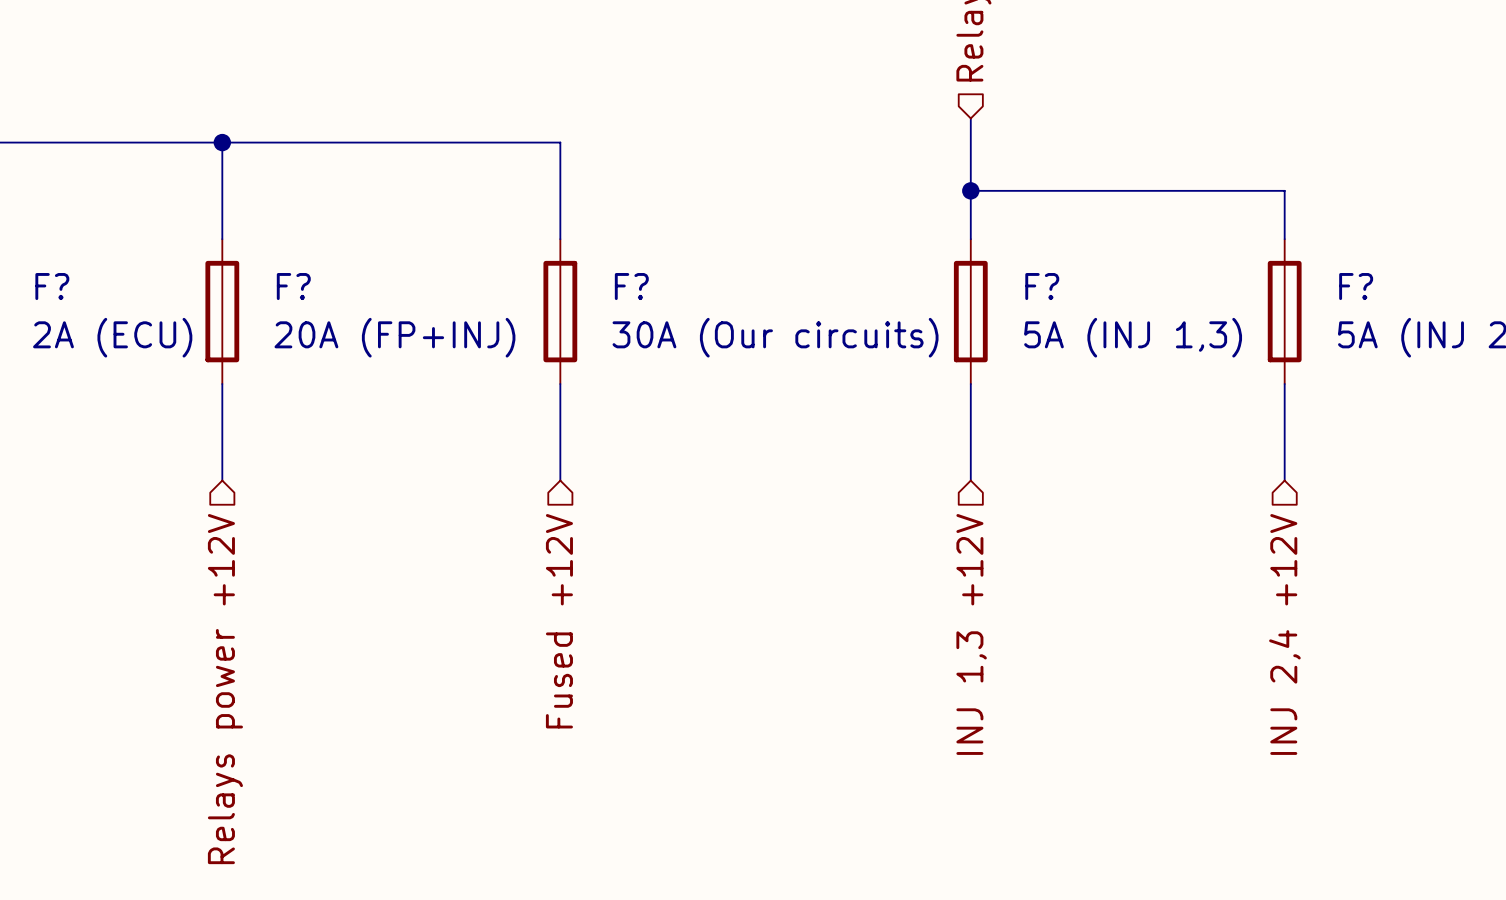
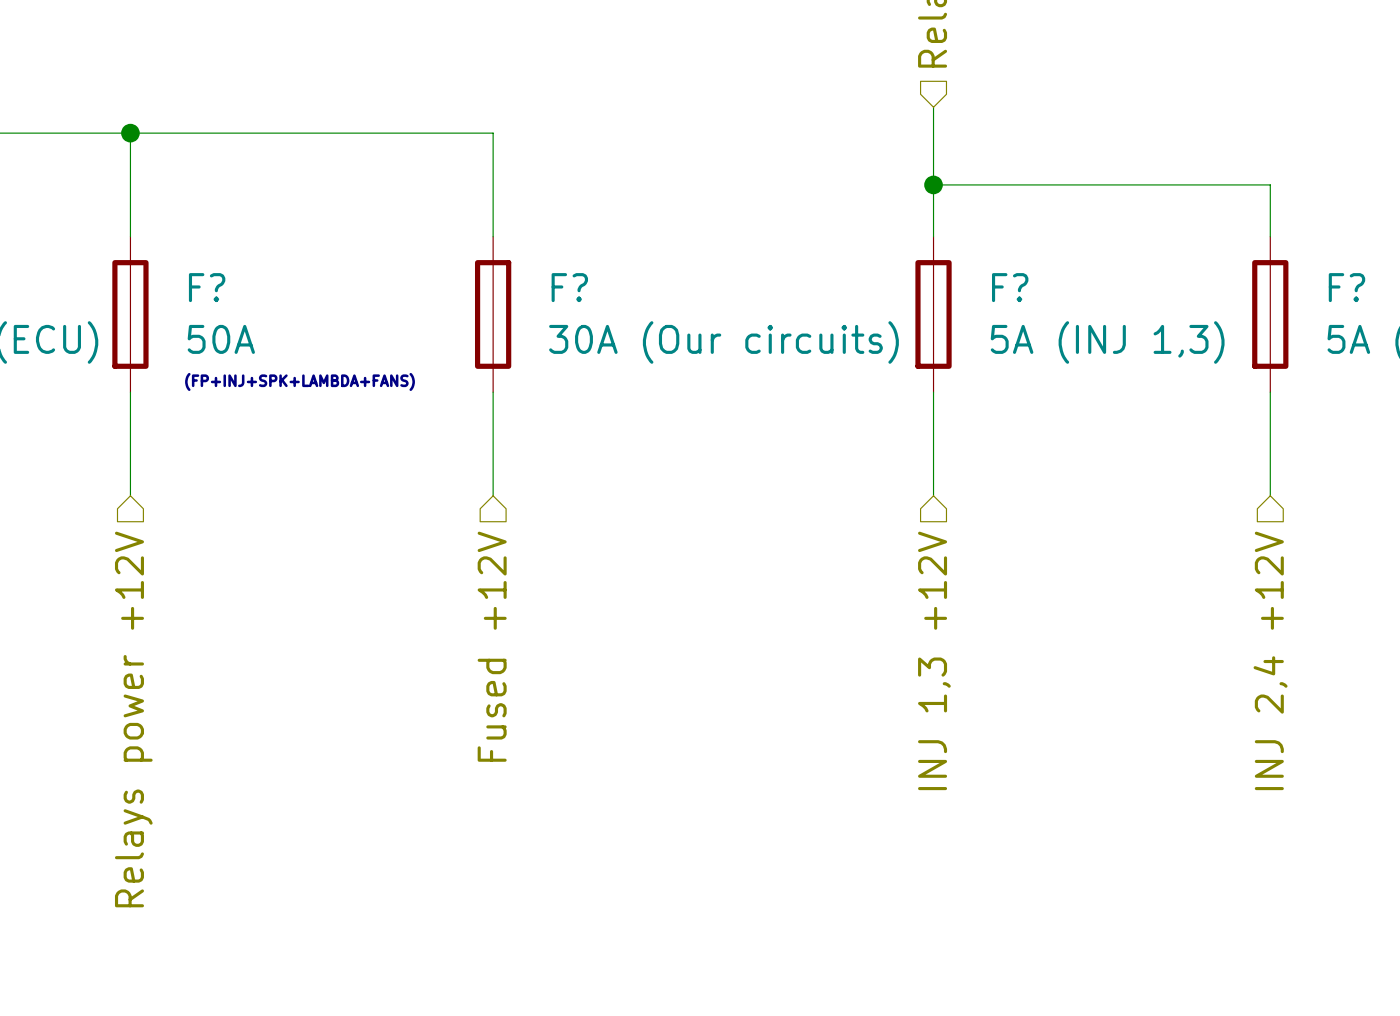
F? value: 20A (FP+INJ) (394, 337) -> 50A (221, 339)
text: none -> (FP+INJ+SPK+LAMBDA+FANS) (300, 381)

